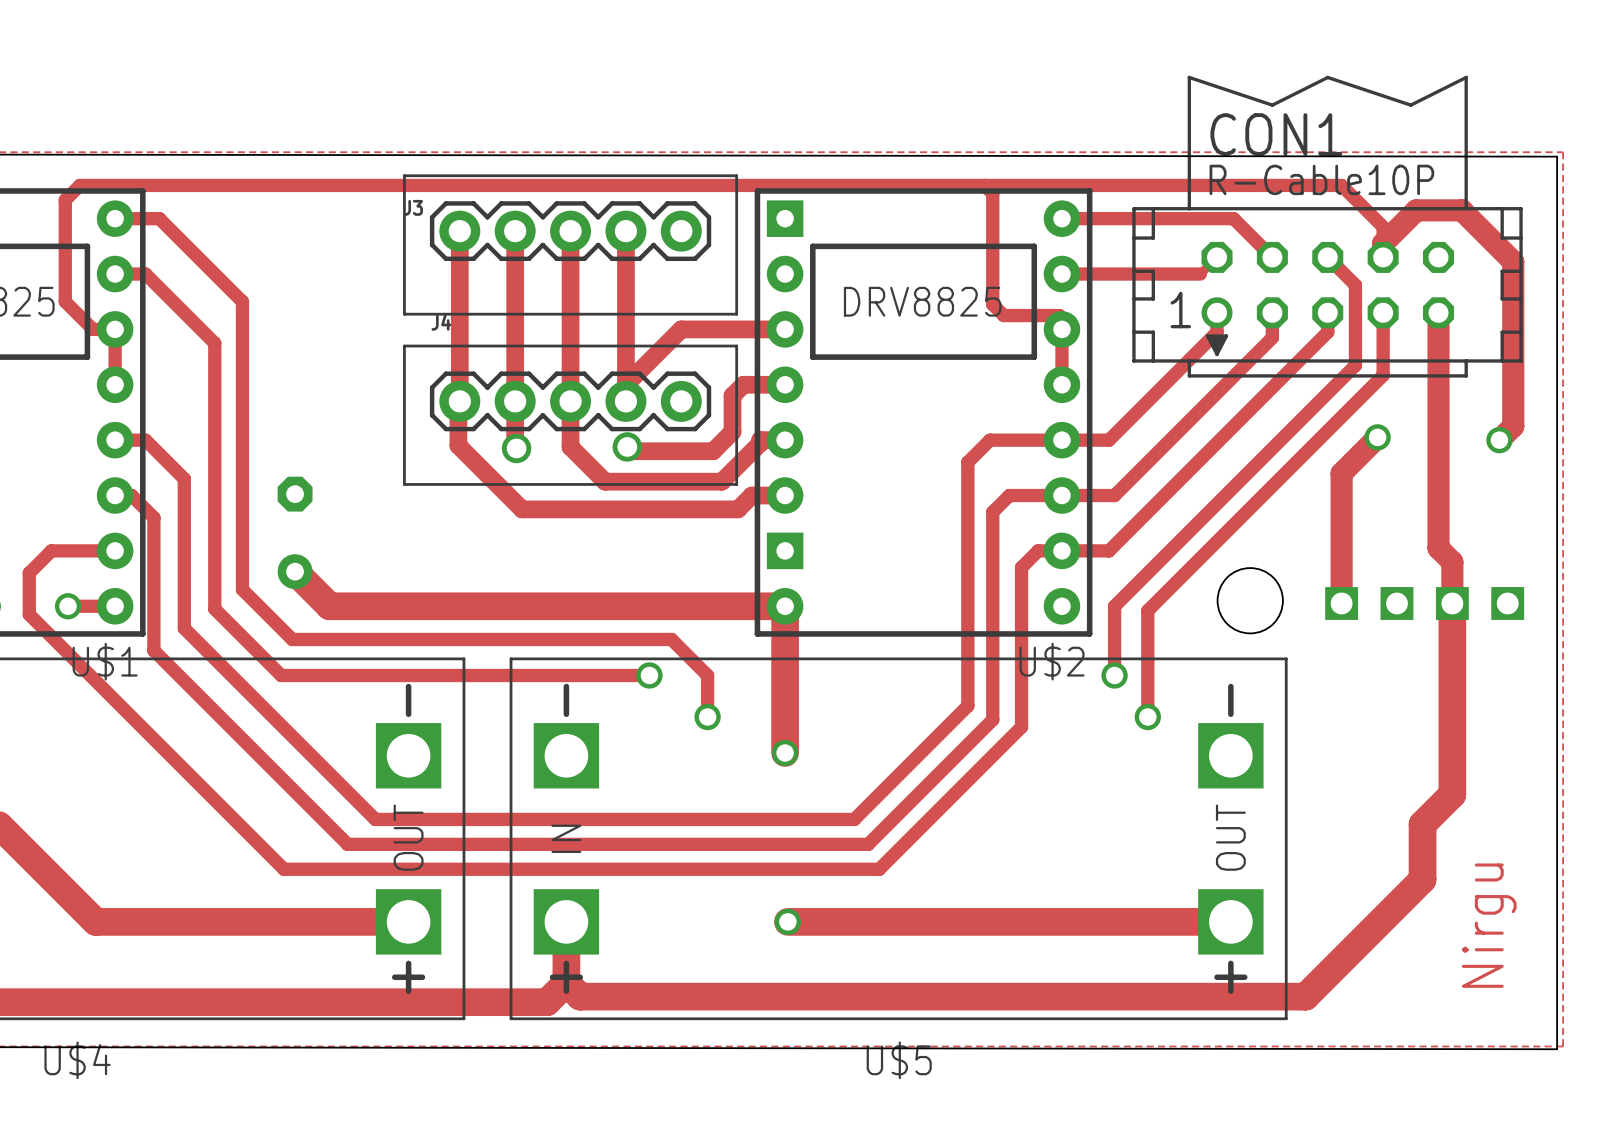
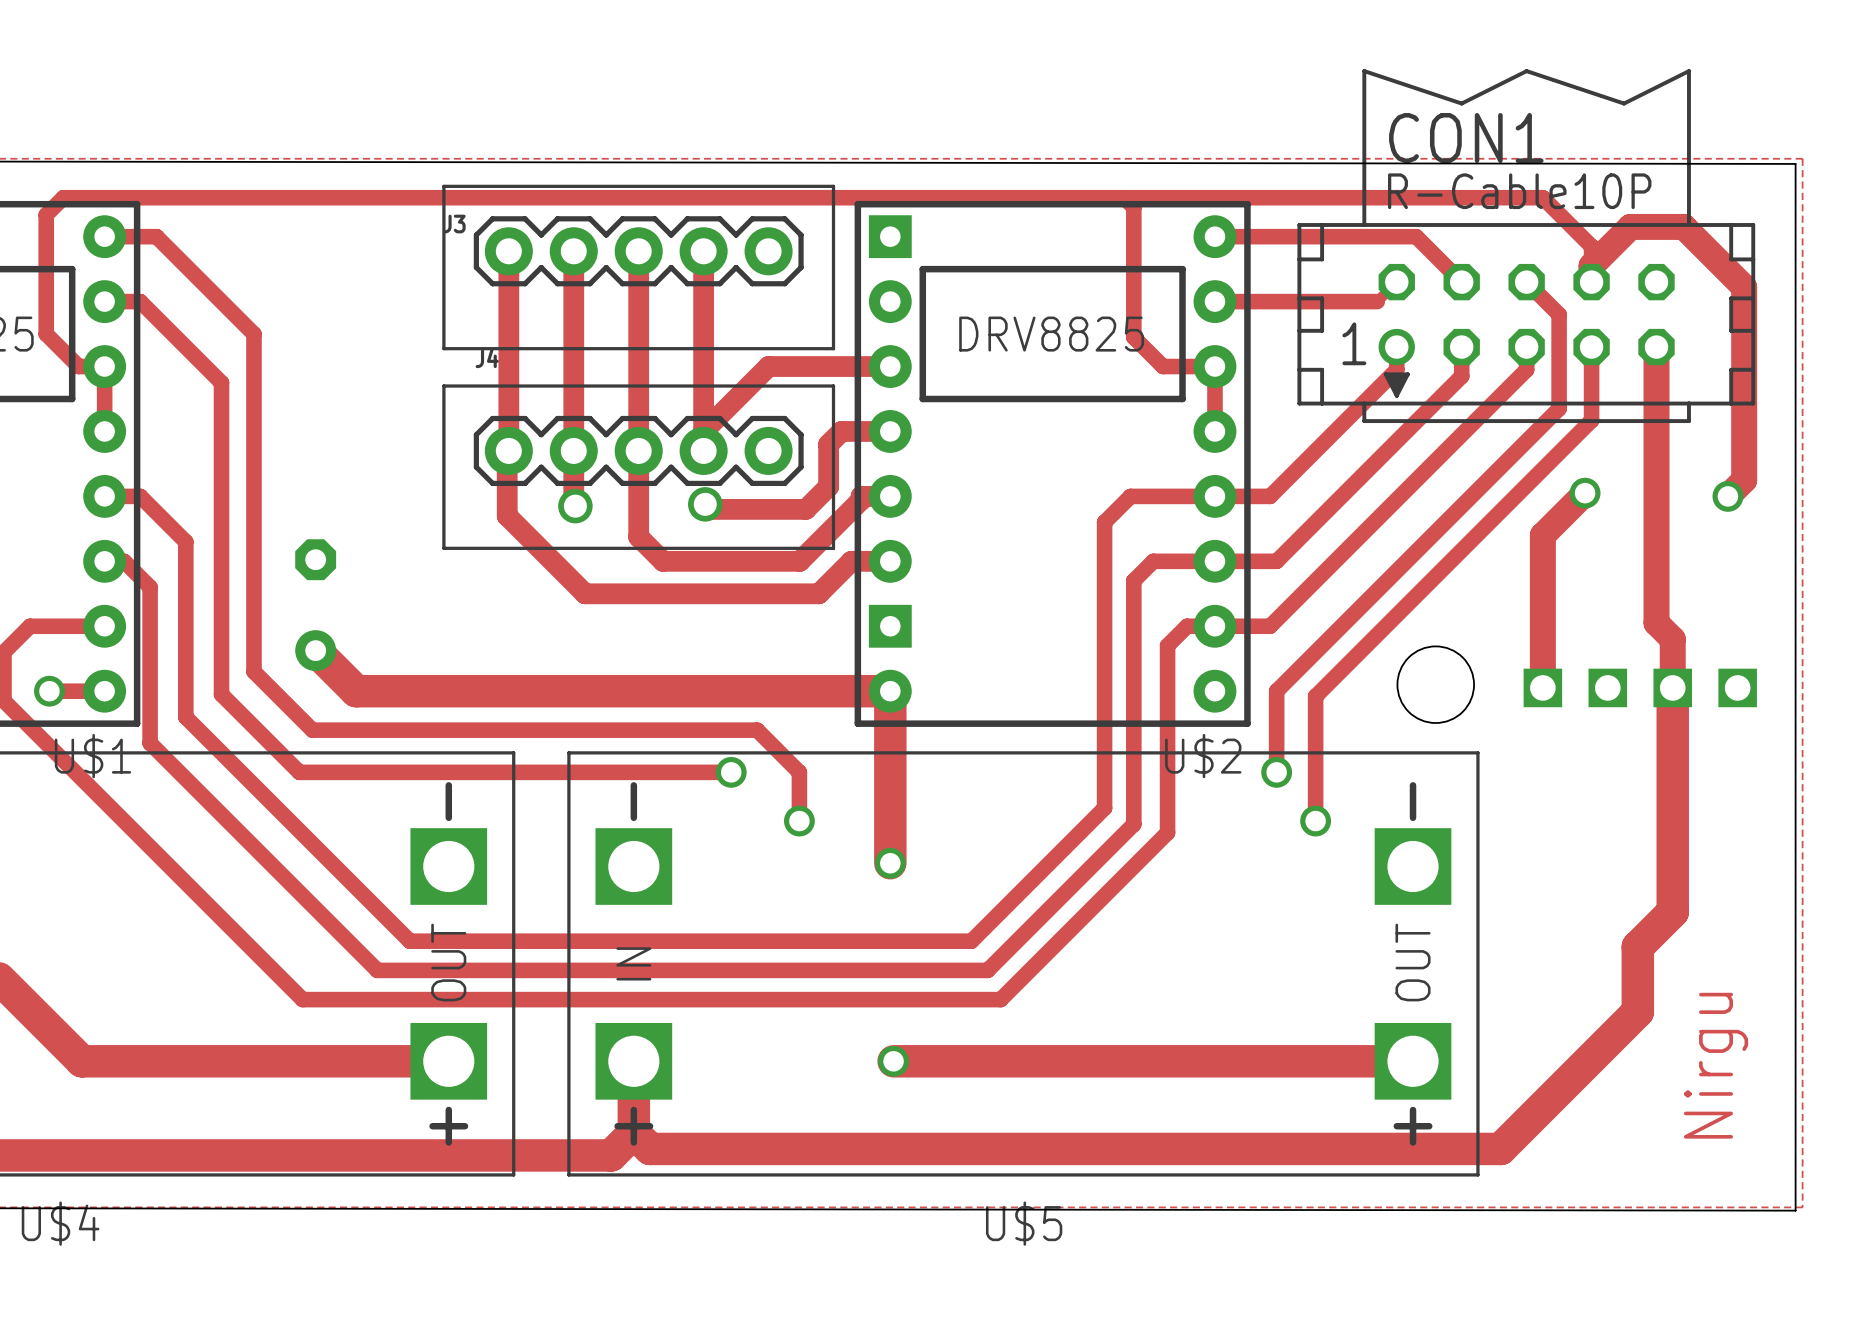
track: (1003, 315) (1059, 315) (1061, 318) (1061, 329) -> (1146, 350) (1163, 366) (1214, 366)
track: (458, 445) (522, 509) (738, 509) -> (507, 502) (507, 515) (585, 593) (818, 593) (835, 577)
track: (570, 447) (605, 481) (721, 481) -> (638, 504) (638, 536) (663, 561) (799, 561) (816, 545)

